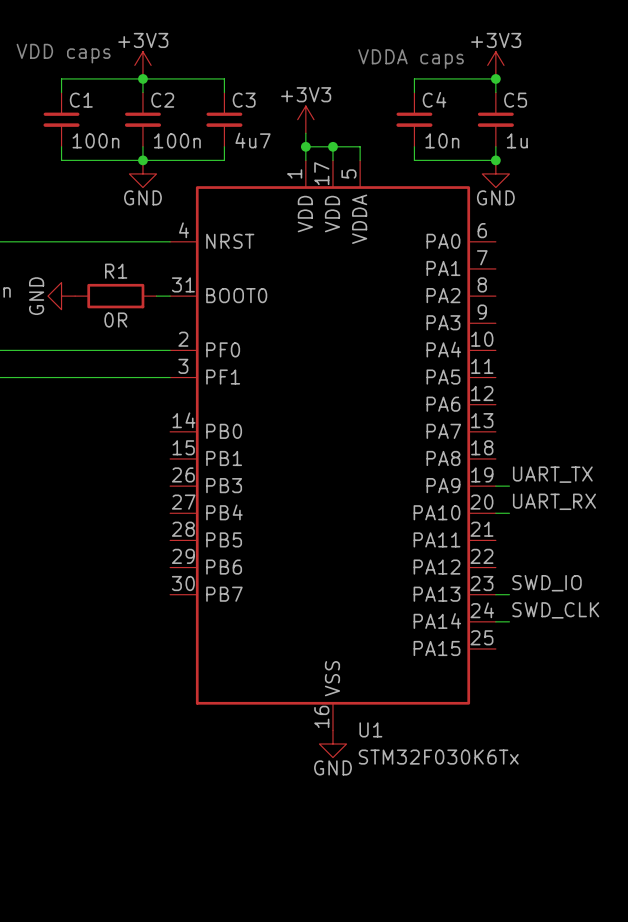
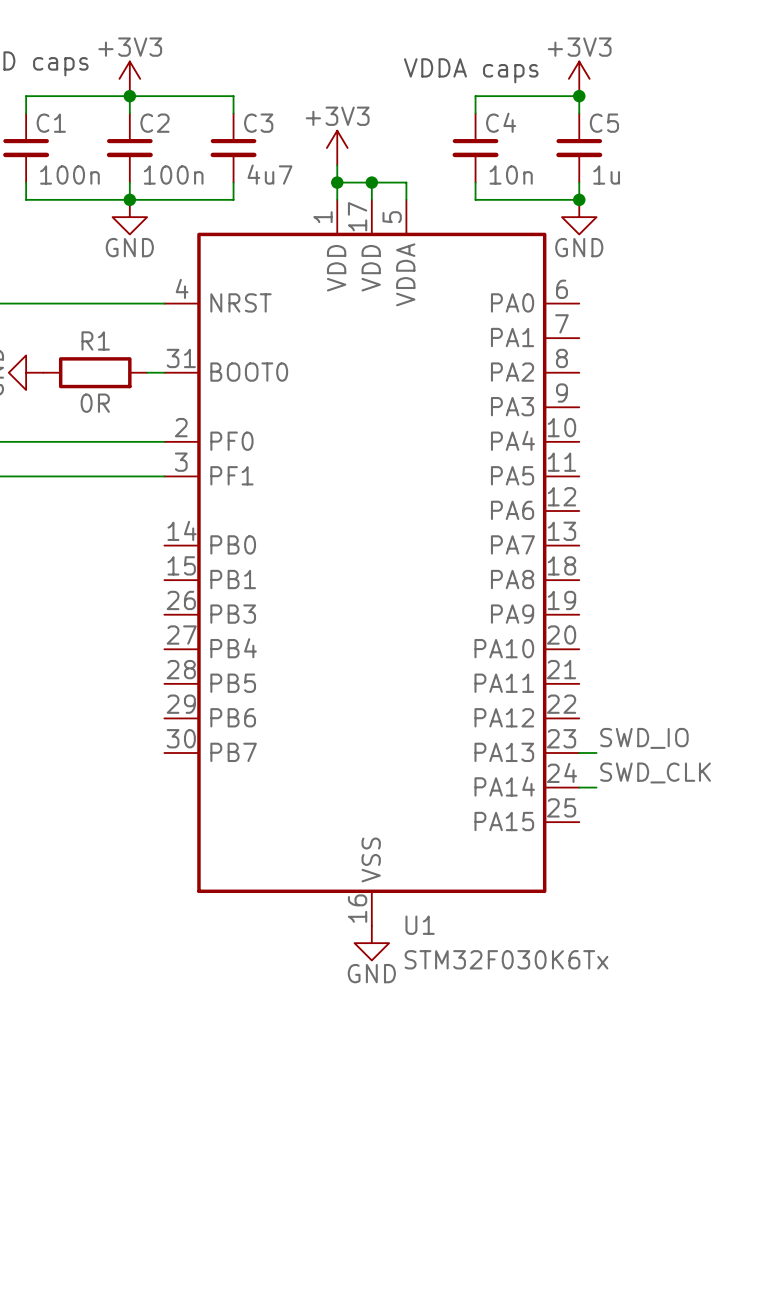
label: UART_TX (552, 474) -> none
wire: (495, 486) (509, 486) -> none
label: UART_RX (554, 501) -> none
wire: (495, 513) (509, 513) -> none

